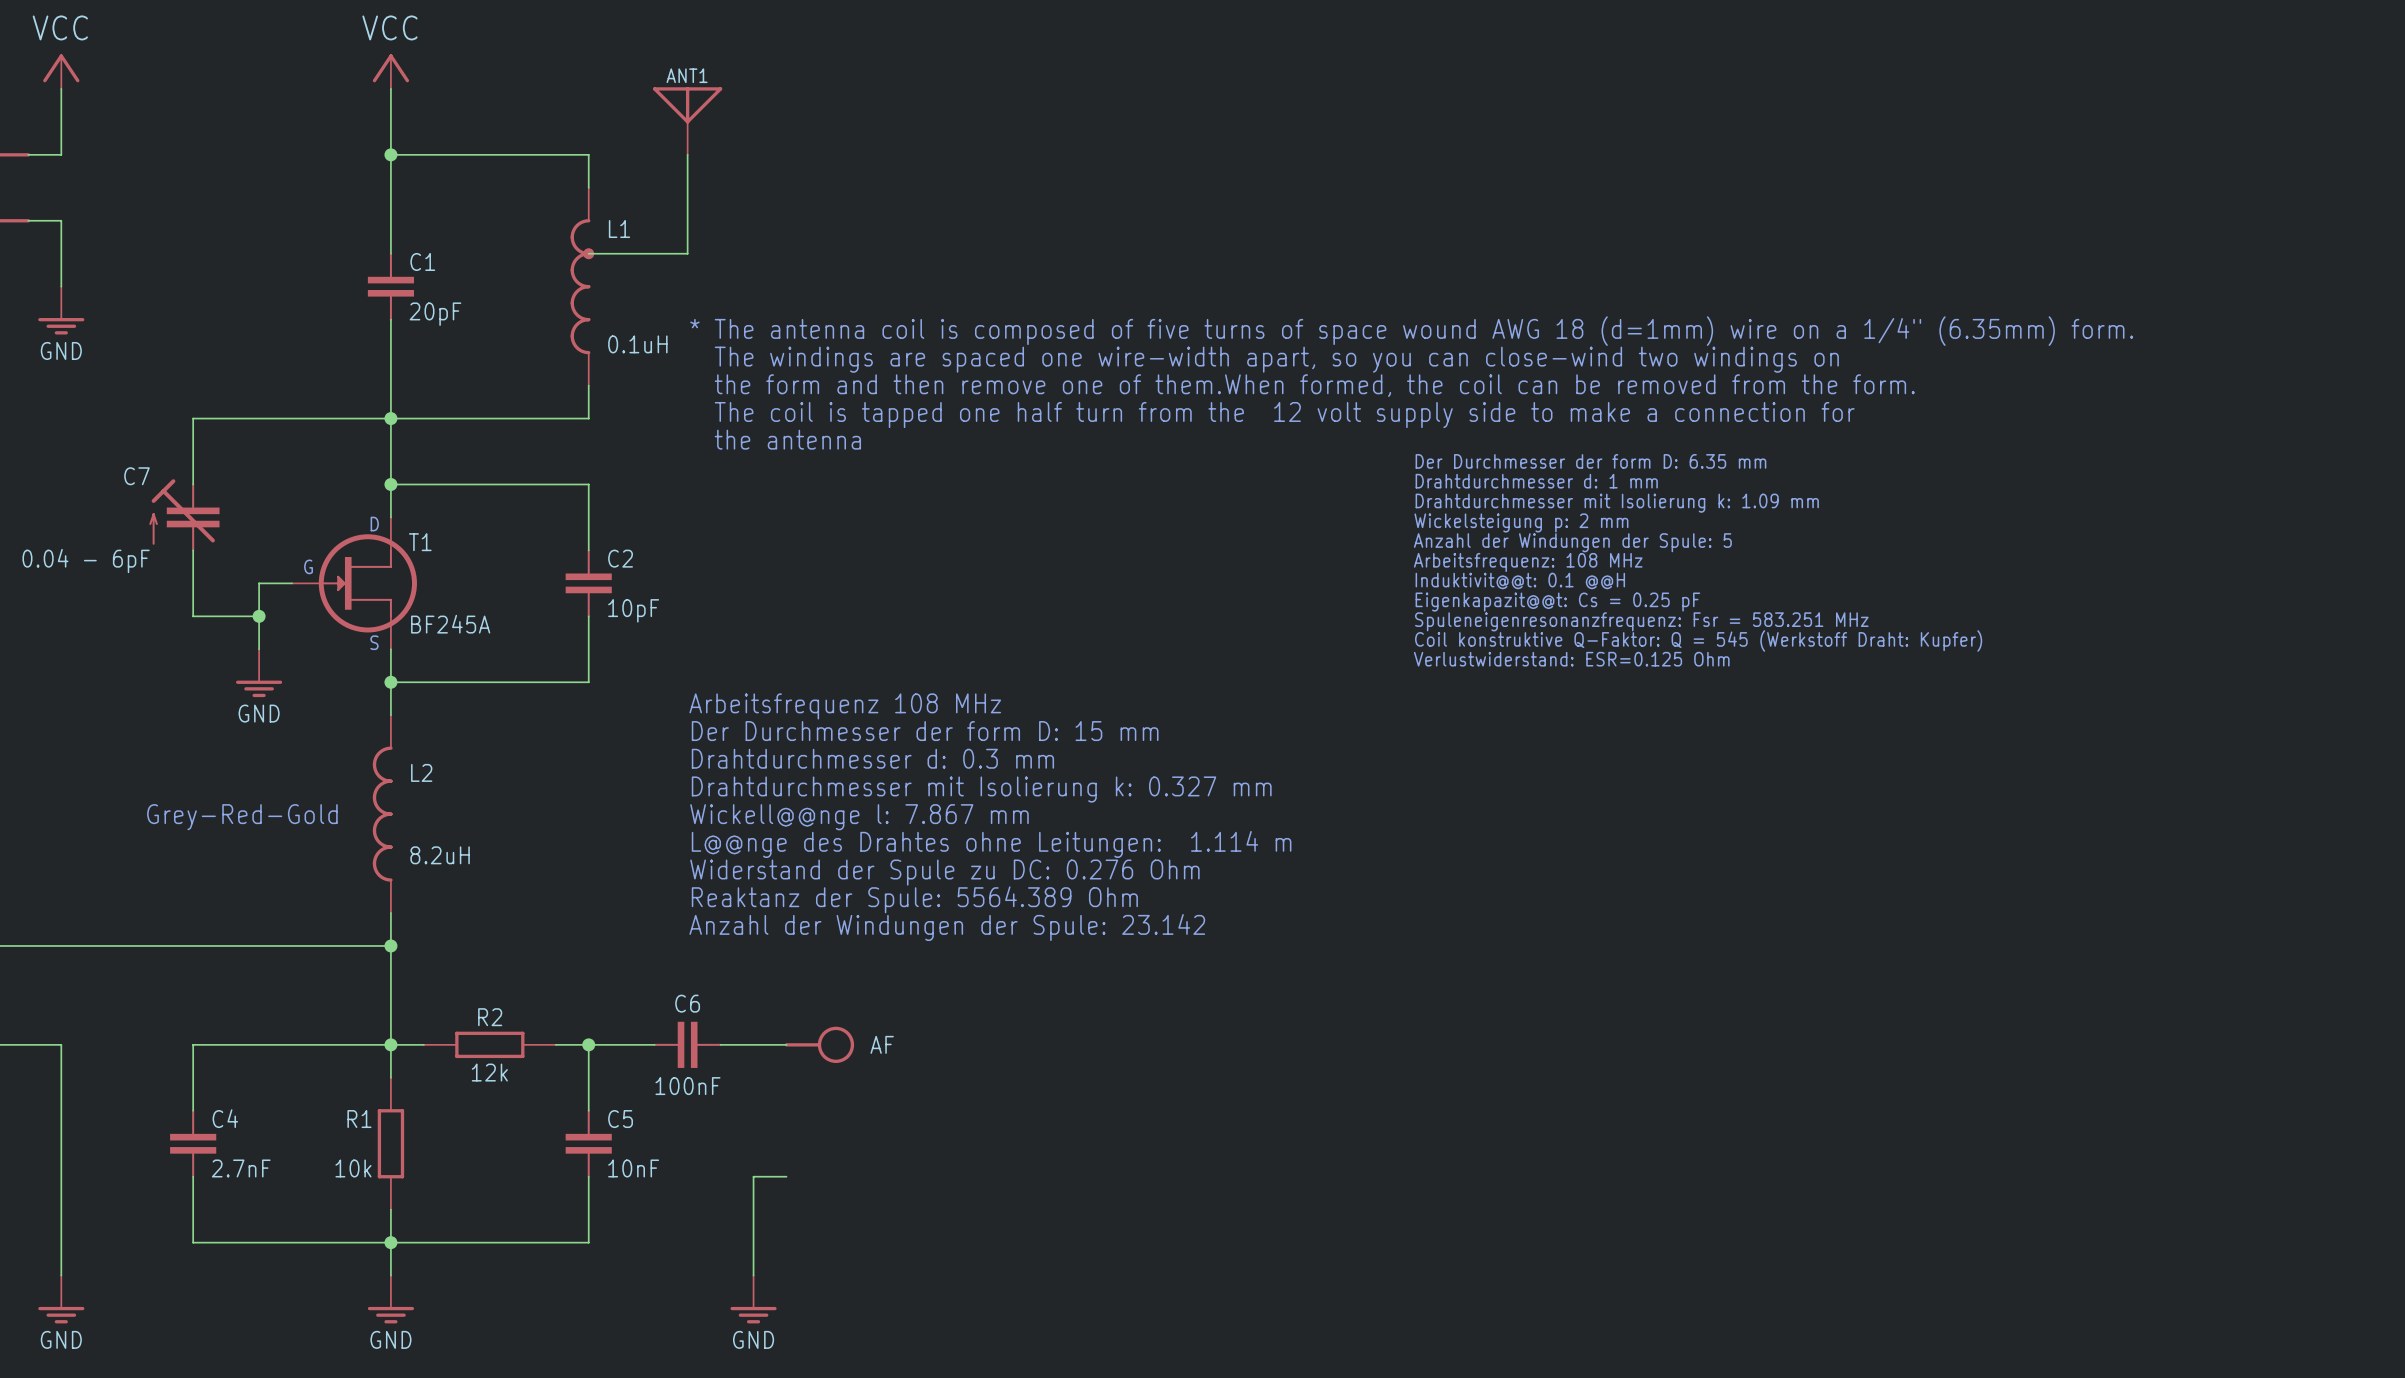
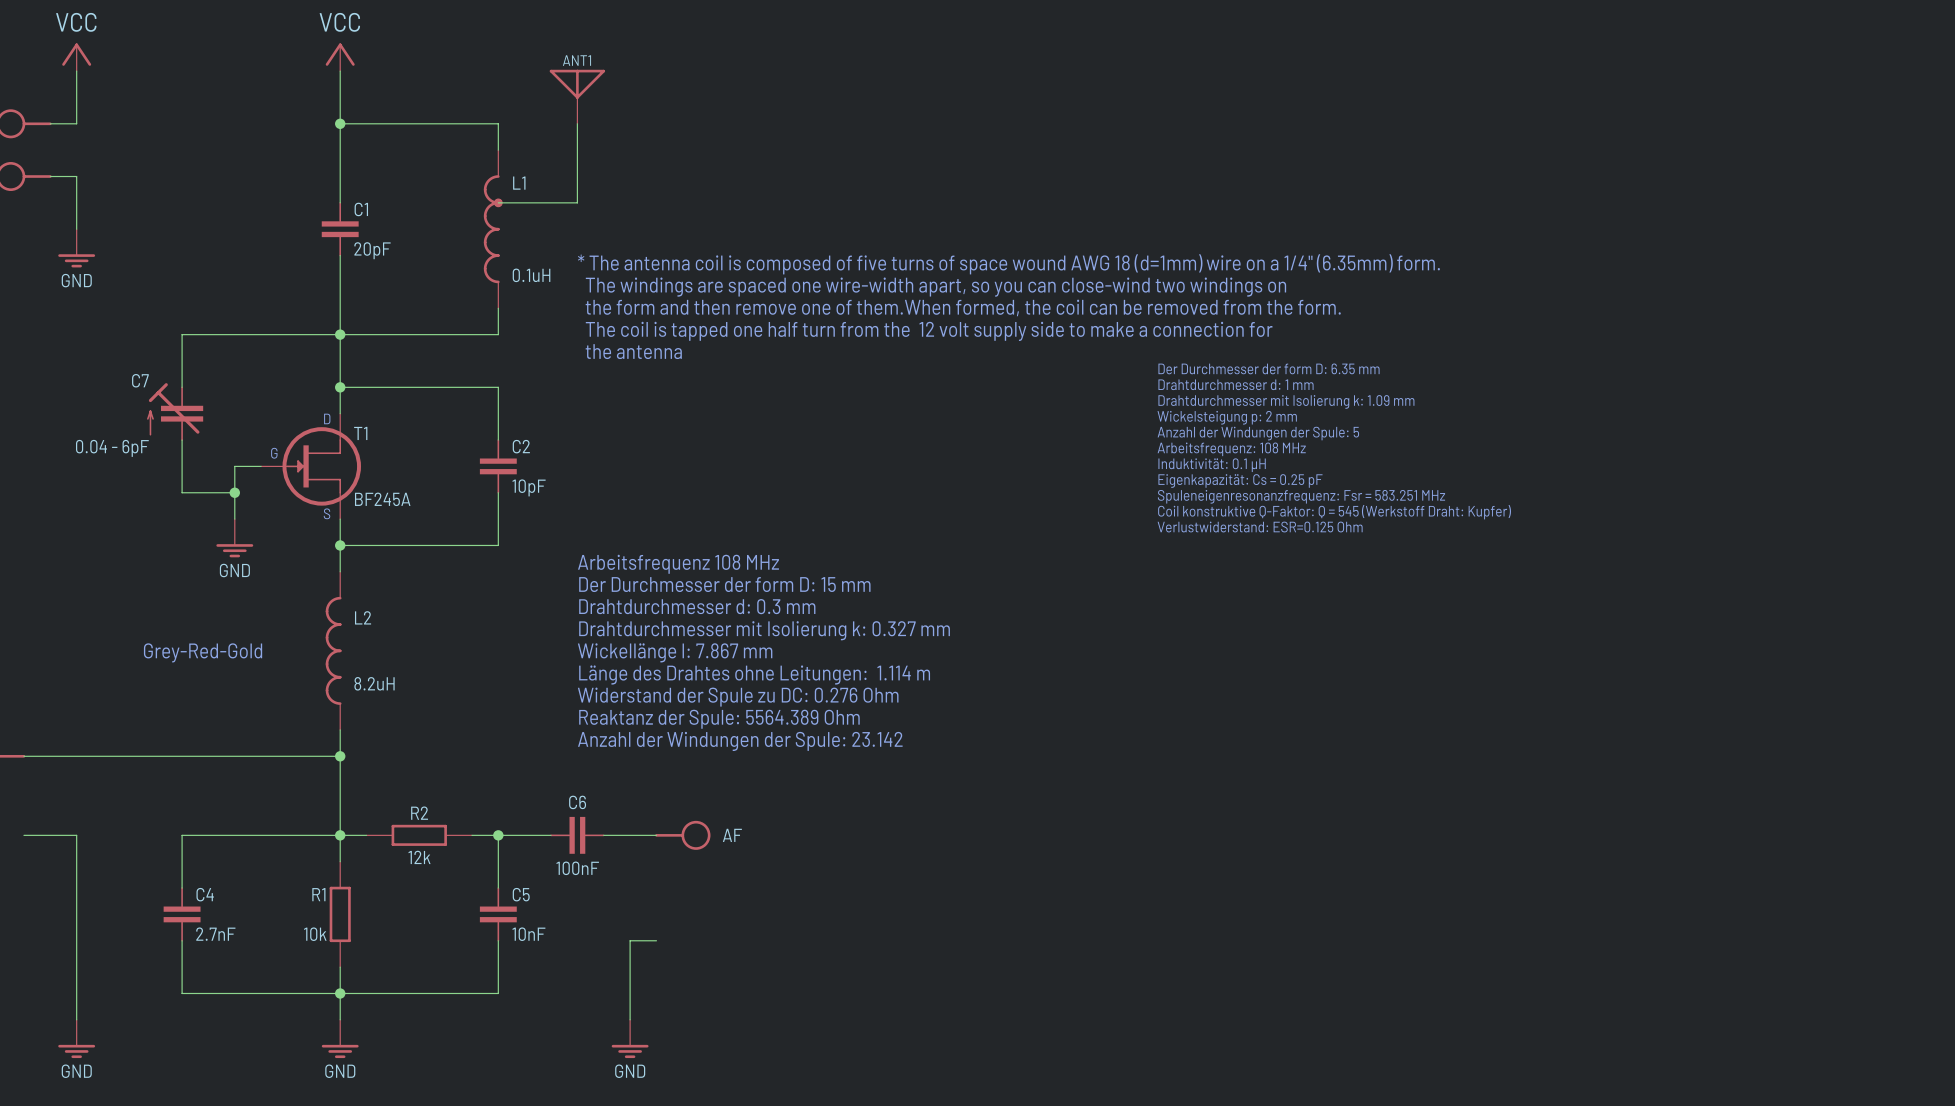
text: Induktivit@@t: 0.1 @@H (1520, 581) -> Induktivität: 0.1 µH (1212, 465)
text: Eigenkapazit@@t: Cs = 0.25 pF (1557, 602) -> Eigenkapazität: Cs = 0.25 pF (1240, 481)
text: Wickell@@nge l: 7.867 mm (859, 817) -> Wickellänge l: 7.867 mm (675, 652)
text: L@@nge des Drahtes ohne Leitungen: 1.114 m (991, 844) -> Länge des Drahtes ohne Leitungen: 1.114 m (754, 675)

